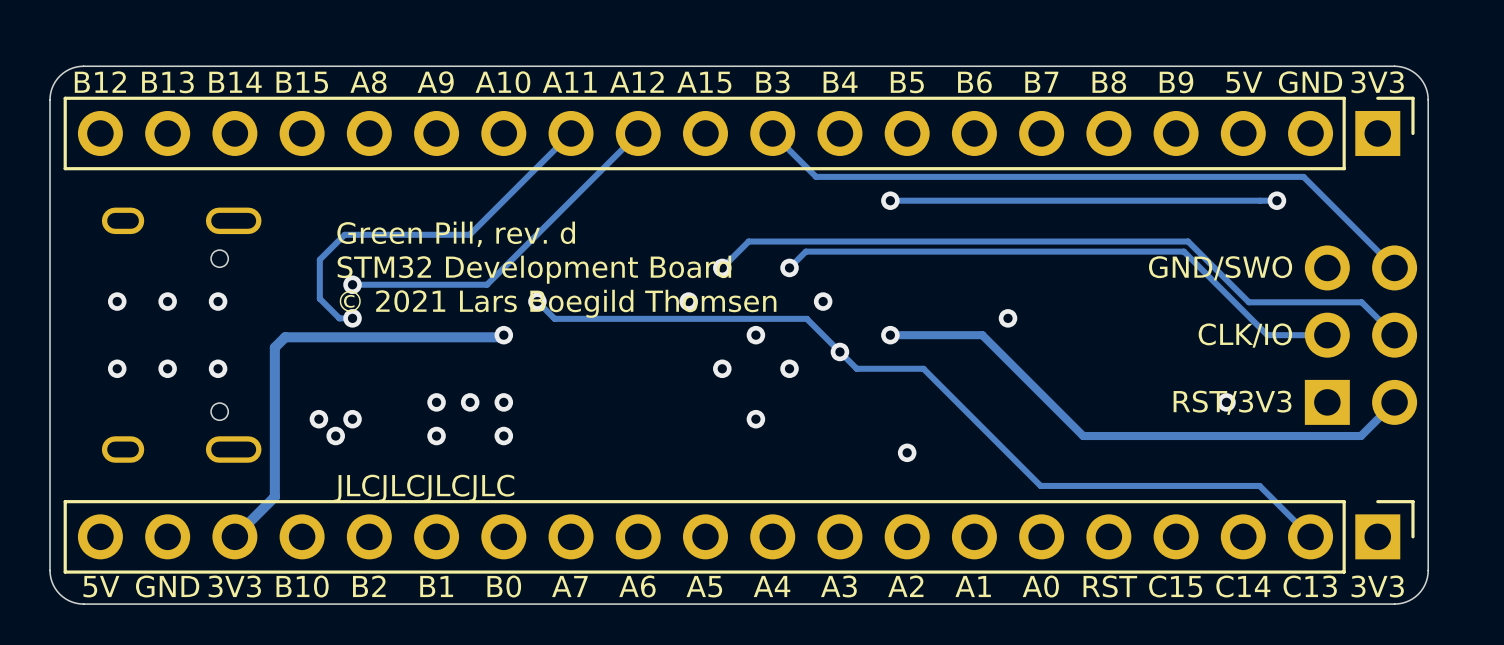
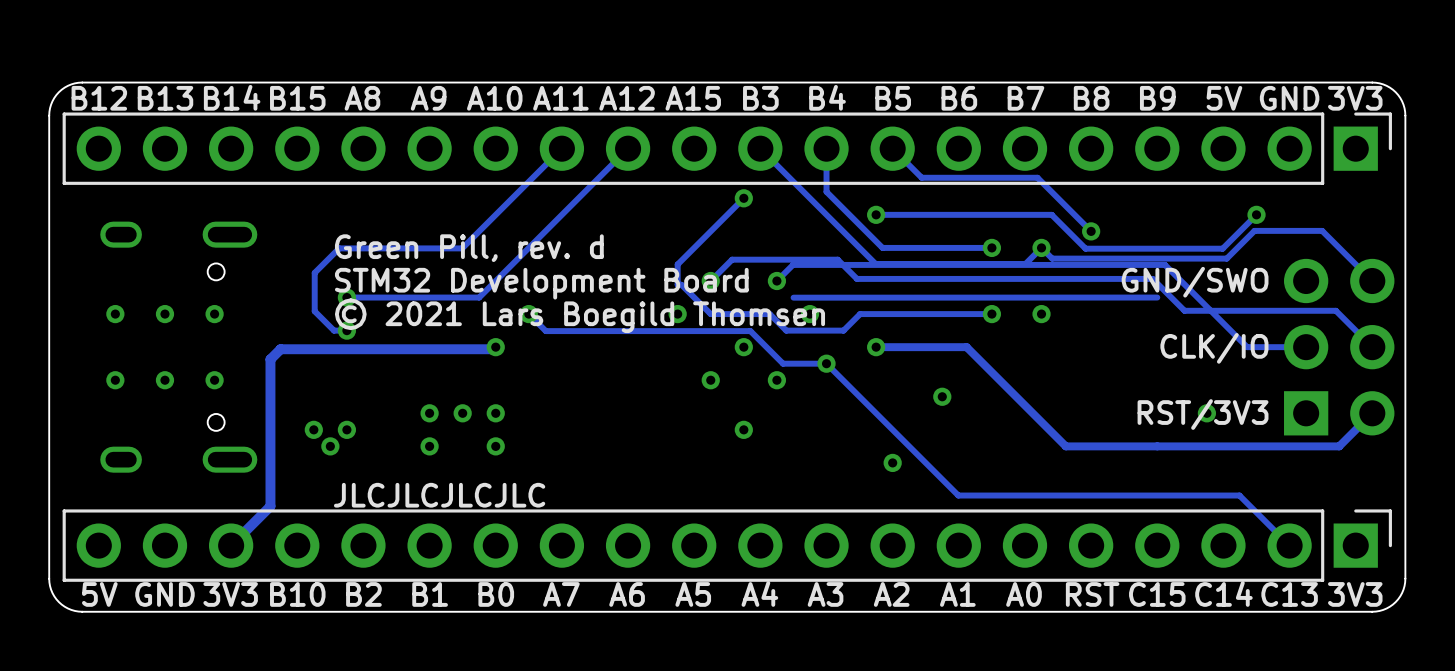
track: none -> (826, 148) (826, 191) (882, 247) (991, 247)
track: none -> (892, 148) (921, 177) (1037, 177) (1091, 231)
track: (816, 176) (1303, 176) (1343, 217) -> (803, 191) (875, 263) (1025, 263) (1041, 247) (1052, 258) (1226, 258) (1254, 230) (1322, 230)
track: none -> (743, 198) (677, 264) (677, 284) (681, 284) (710, 314) (769, 314) (786, 330) (843, 330) (860, 314) (991, 314)
via: none -> (743, 198)
track: (1276, 200) (1068, 200) -> (1256, 214) (1222, 248) (1085, 248) (1051, 214)
via: none -> (1091, 231)
via: none -> (991, 247)
via: none -> (1041, 247)
track: (743, 246) (748, 241) (1188, 241) (1248, 302) (1361, 302) -> (732, 259) (837, 259) (857, 278) (1152, 278) (1184, 310) (1335, 310) (1339, 314)
track: none -> (1157, 297) (793, 297)
via: none -> (1041, 314)
track: (762, 318) (806, 318) (839, 351) -> (750, 331) (783, 363) (826, 363)
via position: (1008, 318) -> (991, 314)
track: (856, 368) (923, 368) (1040, 485) -> (843, 380) (958, 495) (1024, 495)
via: none -> (942, 396)

